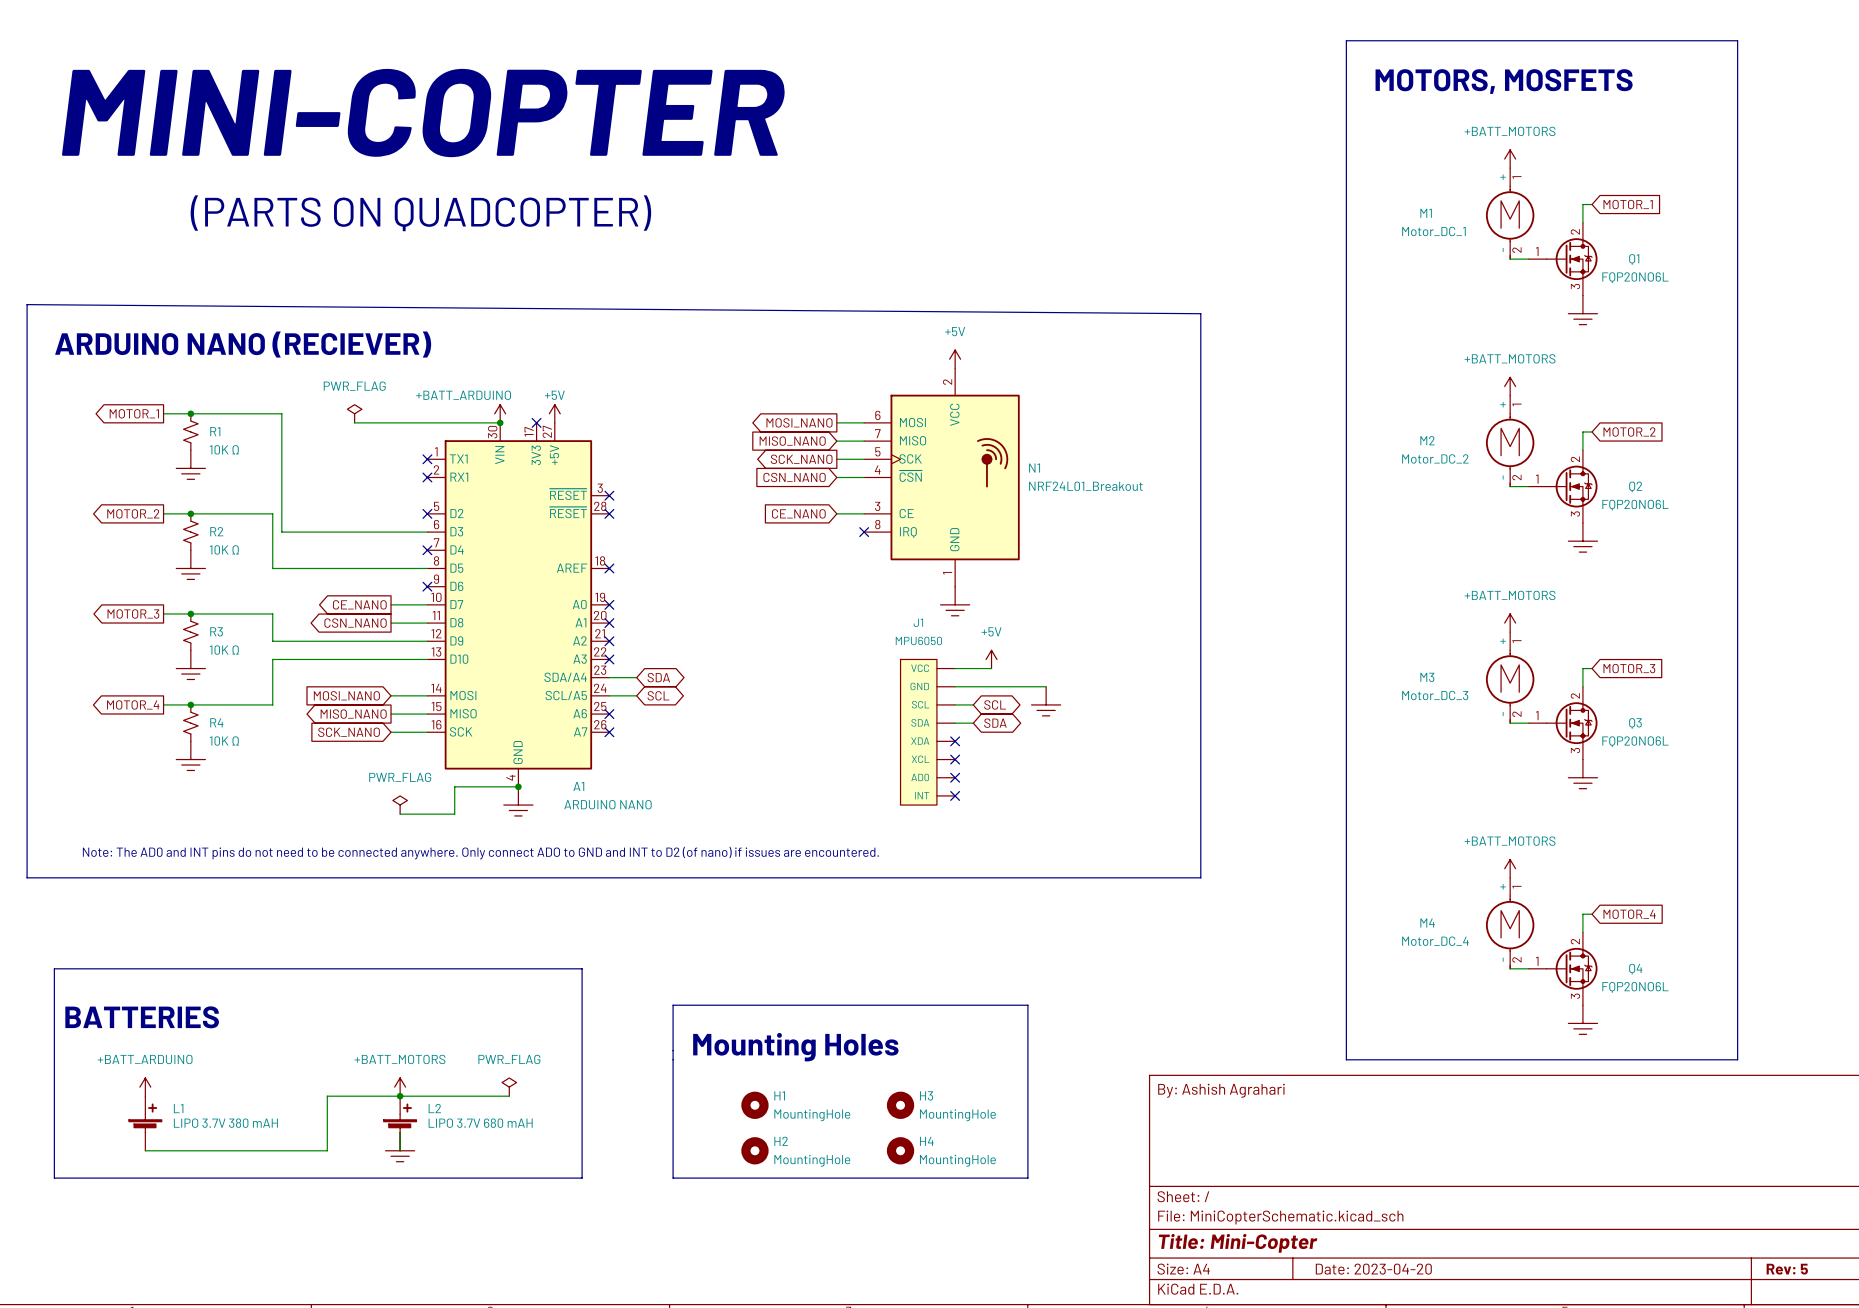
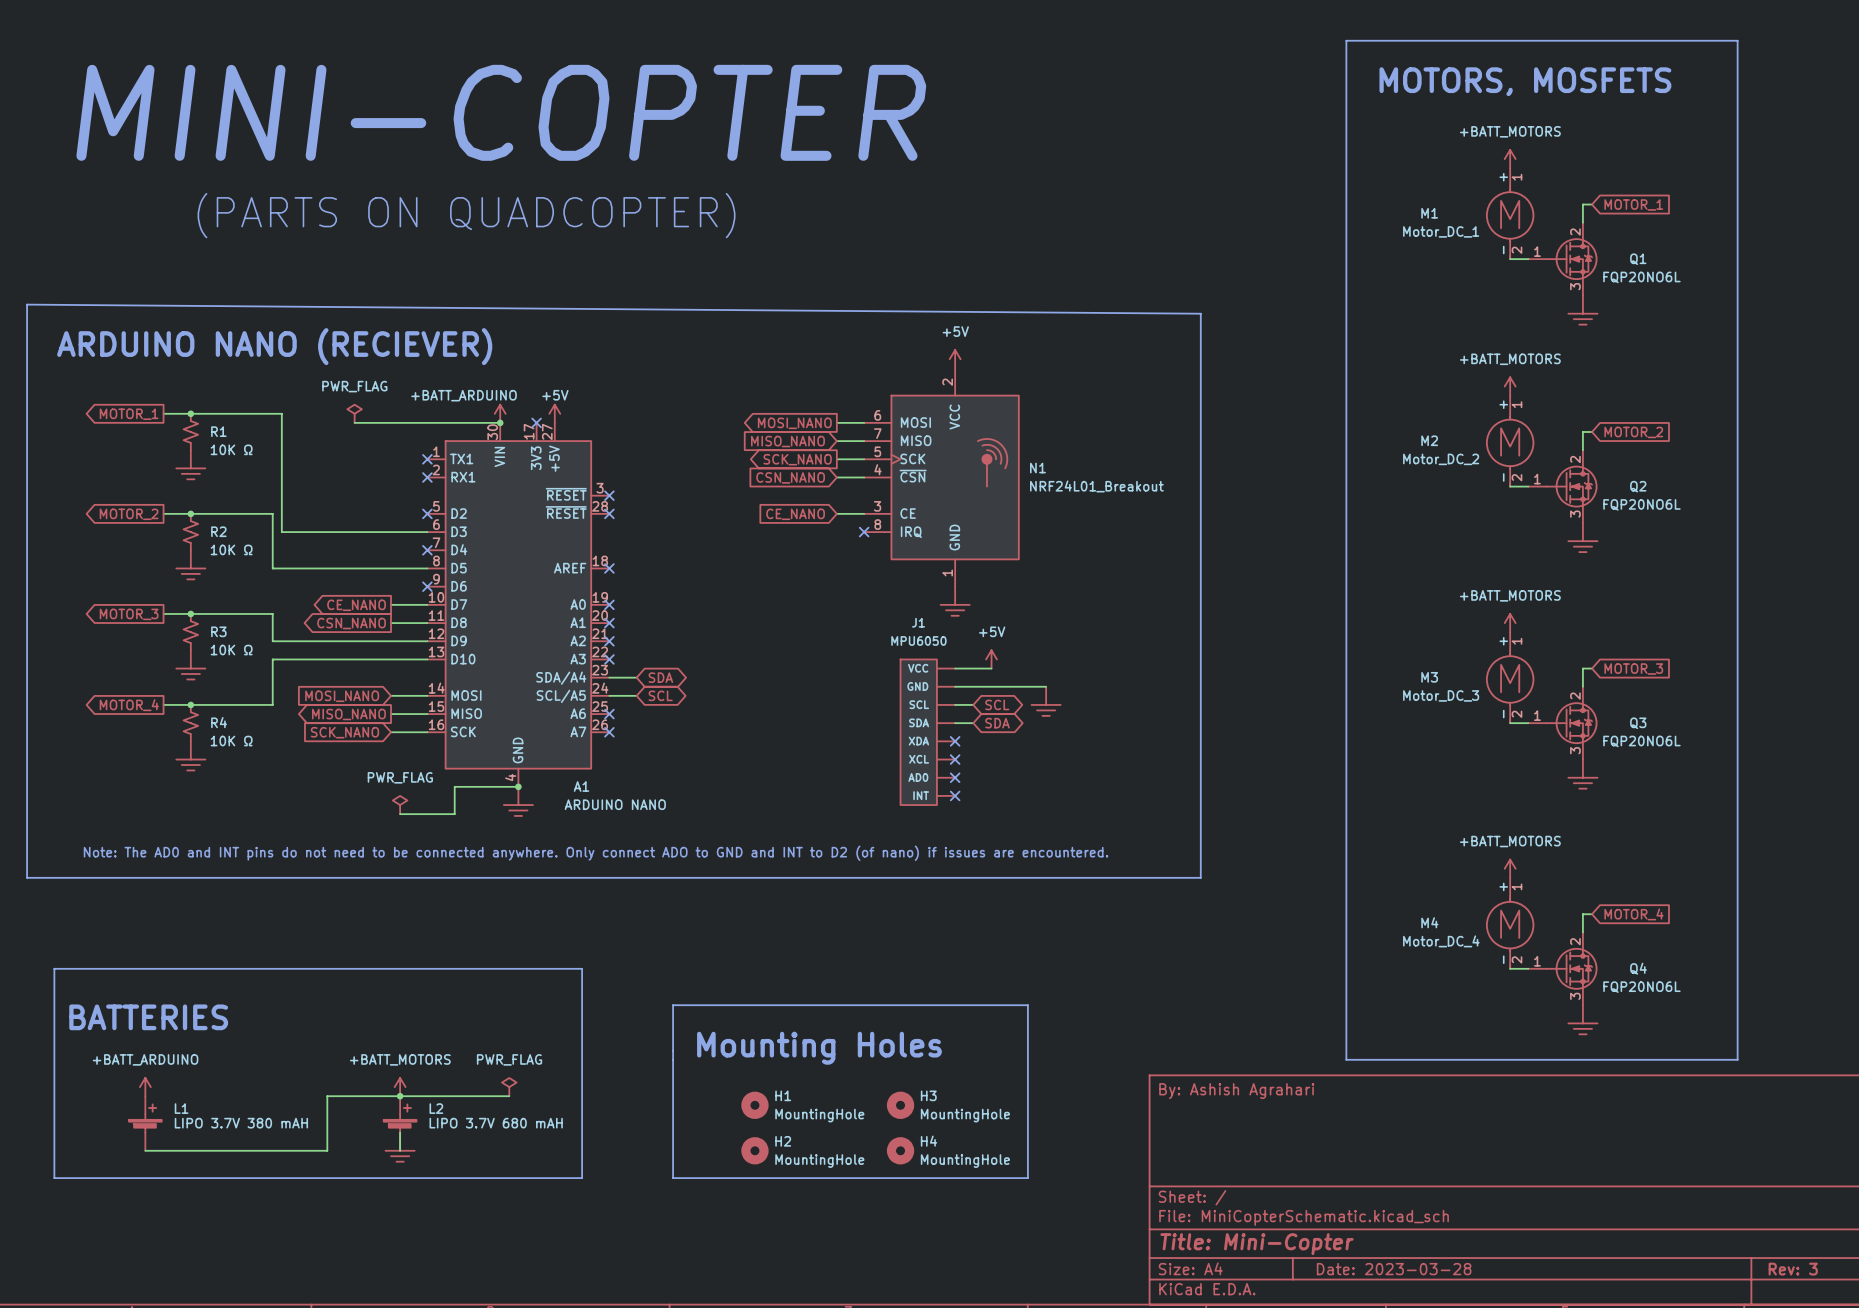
title block: Date: 2023-04-20 (1373, 1269) -> Date: 2023-03-28 (1394, 1269)
title block: Rev: 5 (1787, 1269) -> Rev: 3 (1793, 1269)

